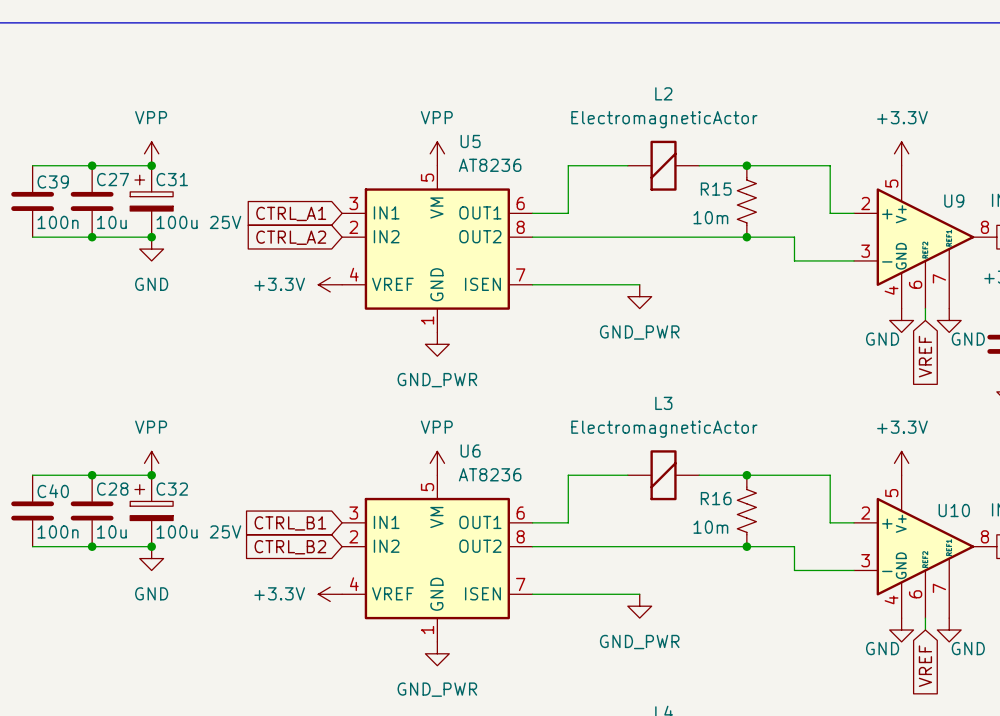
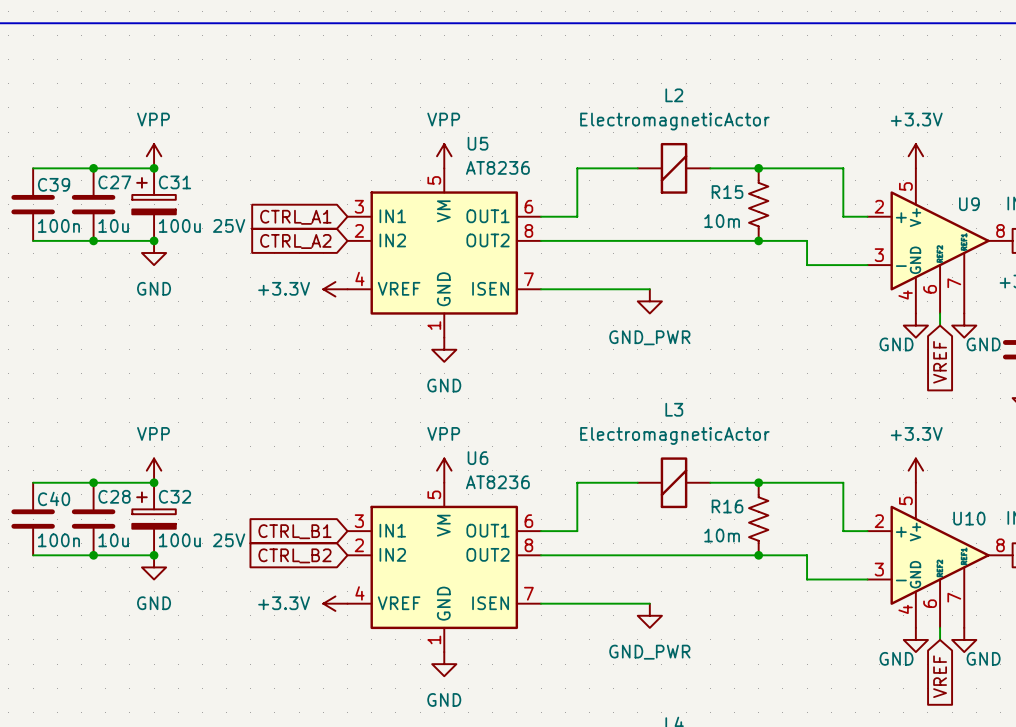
power symbol: GND_PWR (437, 344) -> GND (444, 349)
power symbol: GND_PWR (437, 653) -> GND (444, 664)

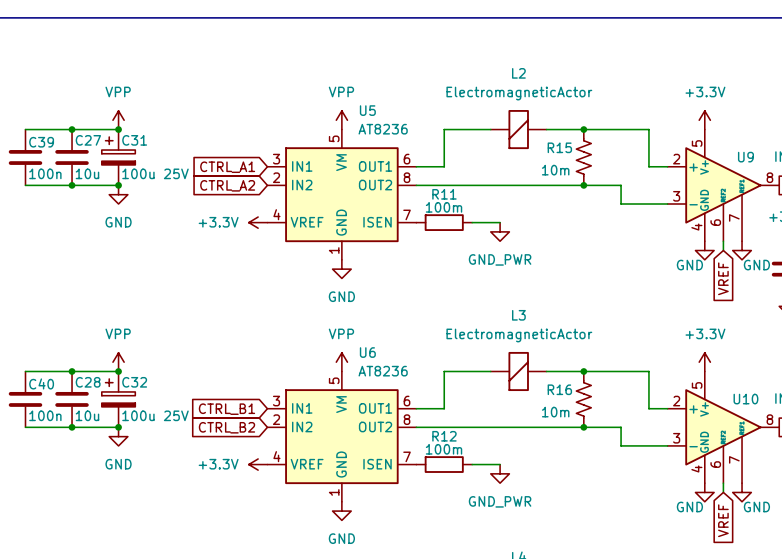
wire: (541, 289) (613, 289) -> none
R11: none -> 100m (444, 222)
wire: (541, 603) (613, 603) -> none
R12: none -> 100m (444, 464)

